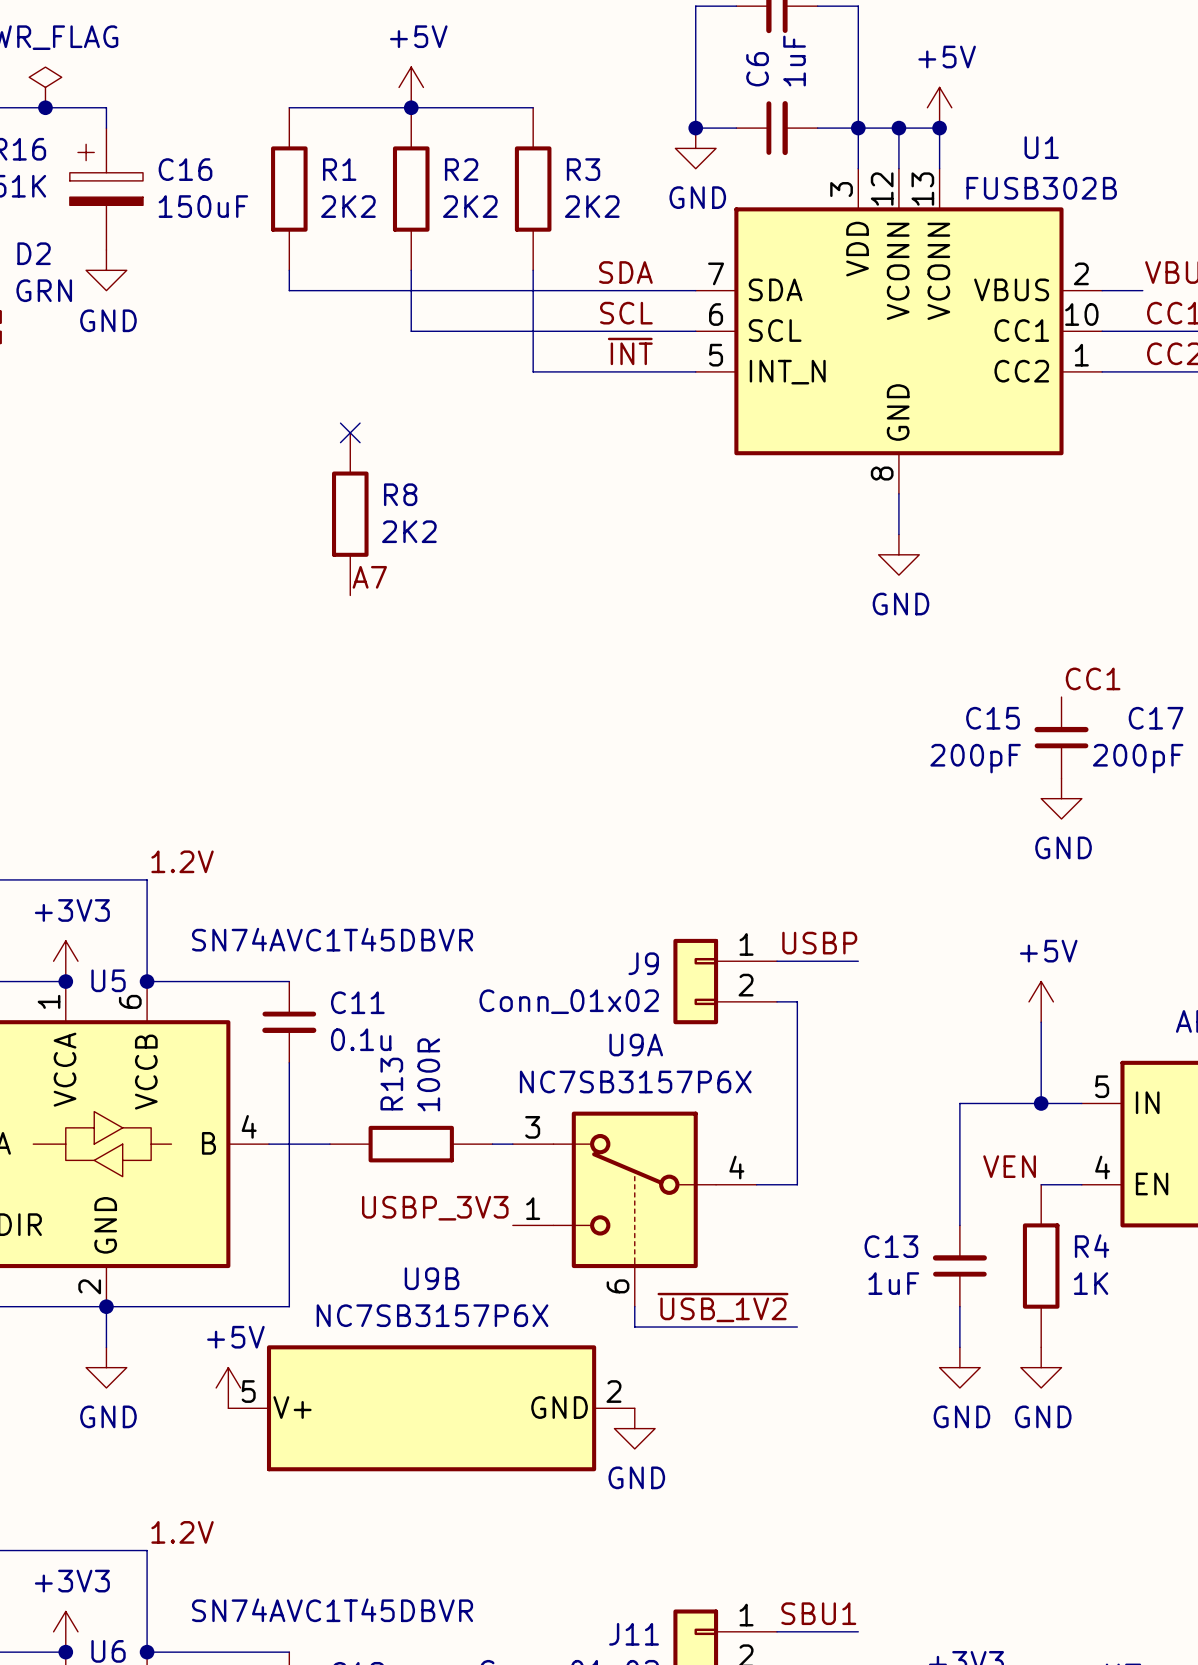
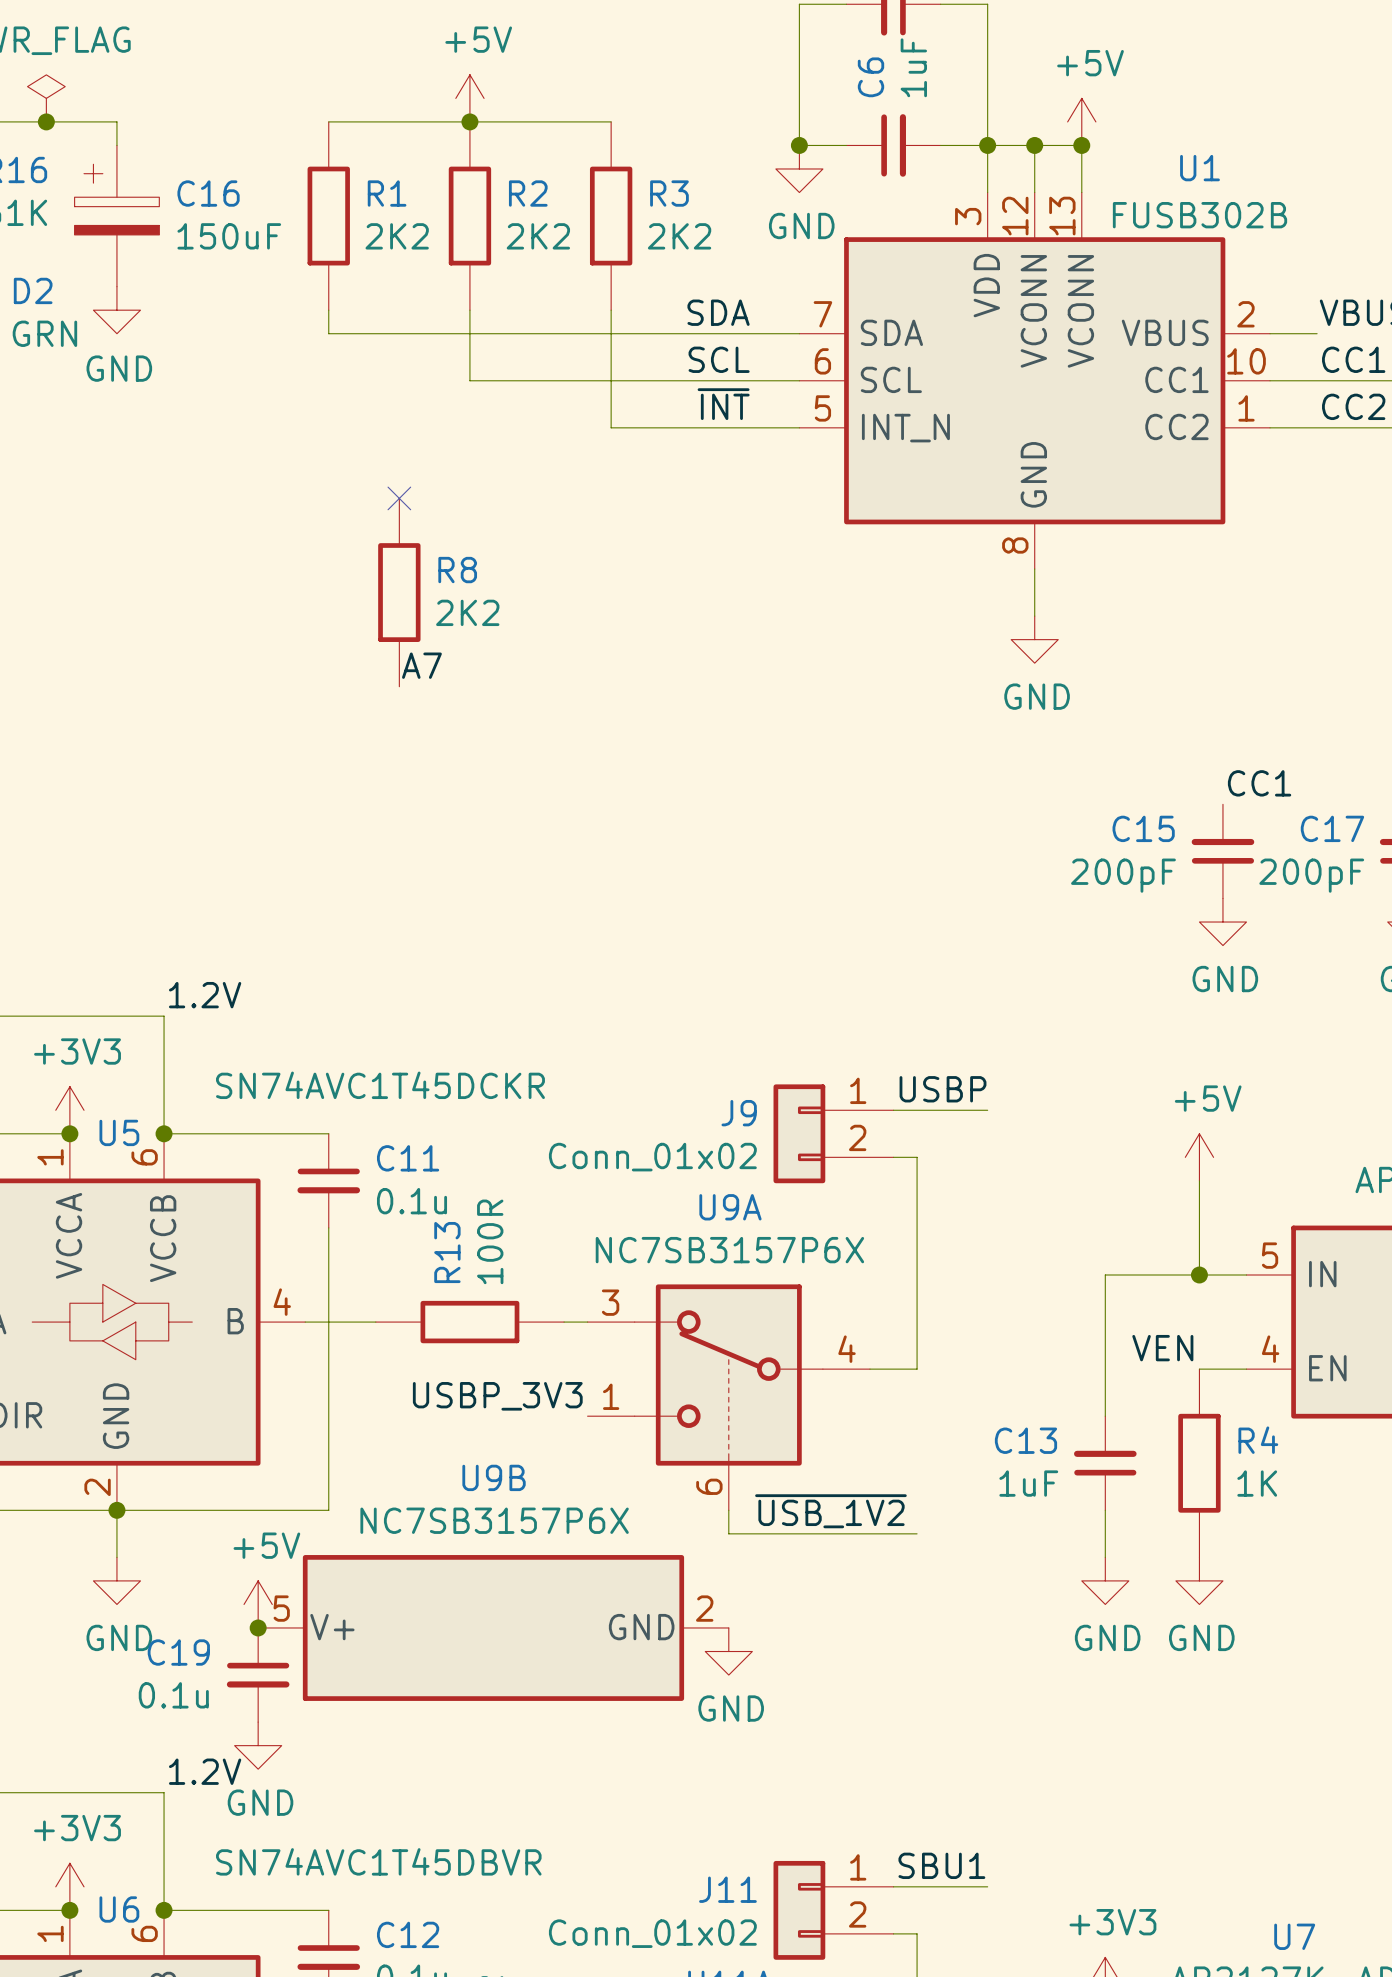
U5 value: SN74AVC1T45DBVR (332, 939) -> SN74AVC1T45DCKR (380, 1085)
junction: none -> (258, 1627)
C19: none -> 0.1u (258, 1675)
power symbol: none -> GND (258, 1745)

